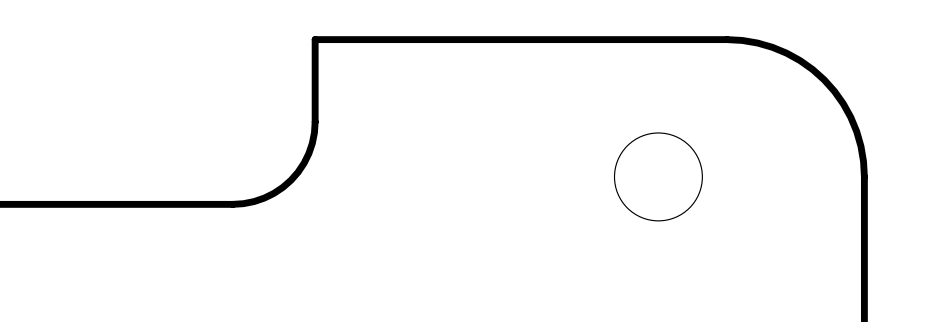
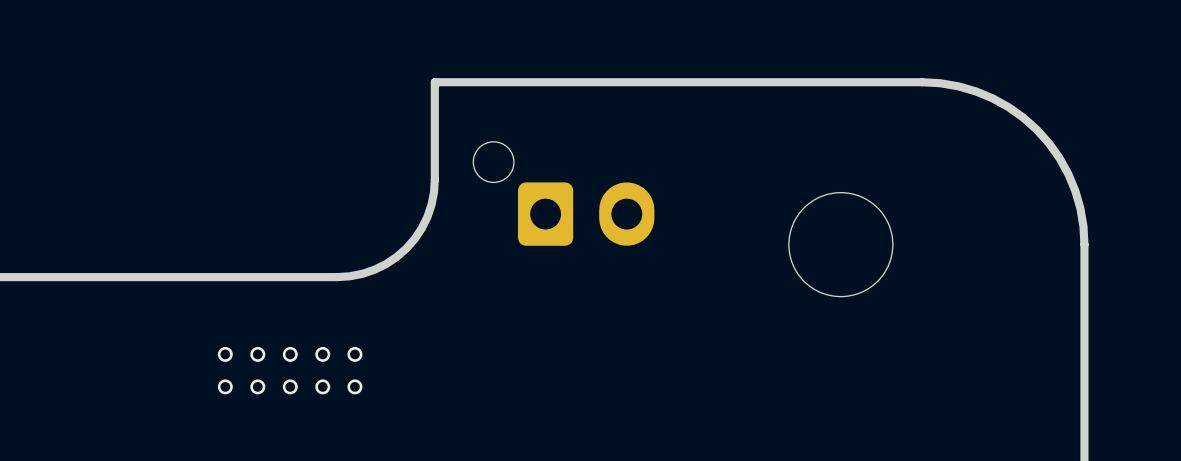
part: none -> (563, 193)
via: none -> (225, 354)
via: none -> (257, 354)
via: none -> (290, 354)
via: none -> (322, 354)
via: none -> (354, 354)
via: none -> (225, 386)
via: none -> (257, 386)
via: none -> (290, 386)
via: none -> (322, 386)
via: none -> (354, 386)

